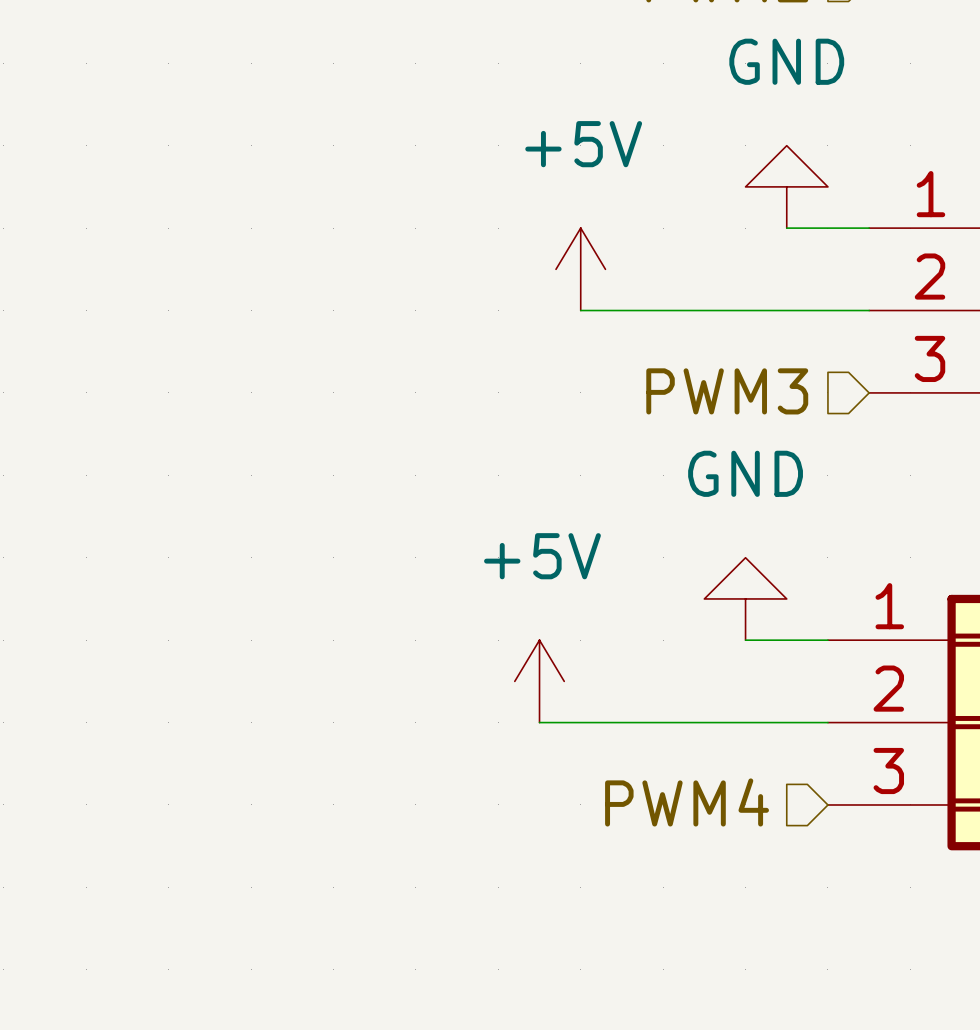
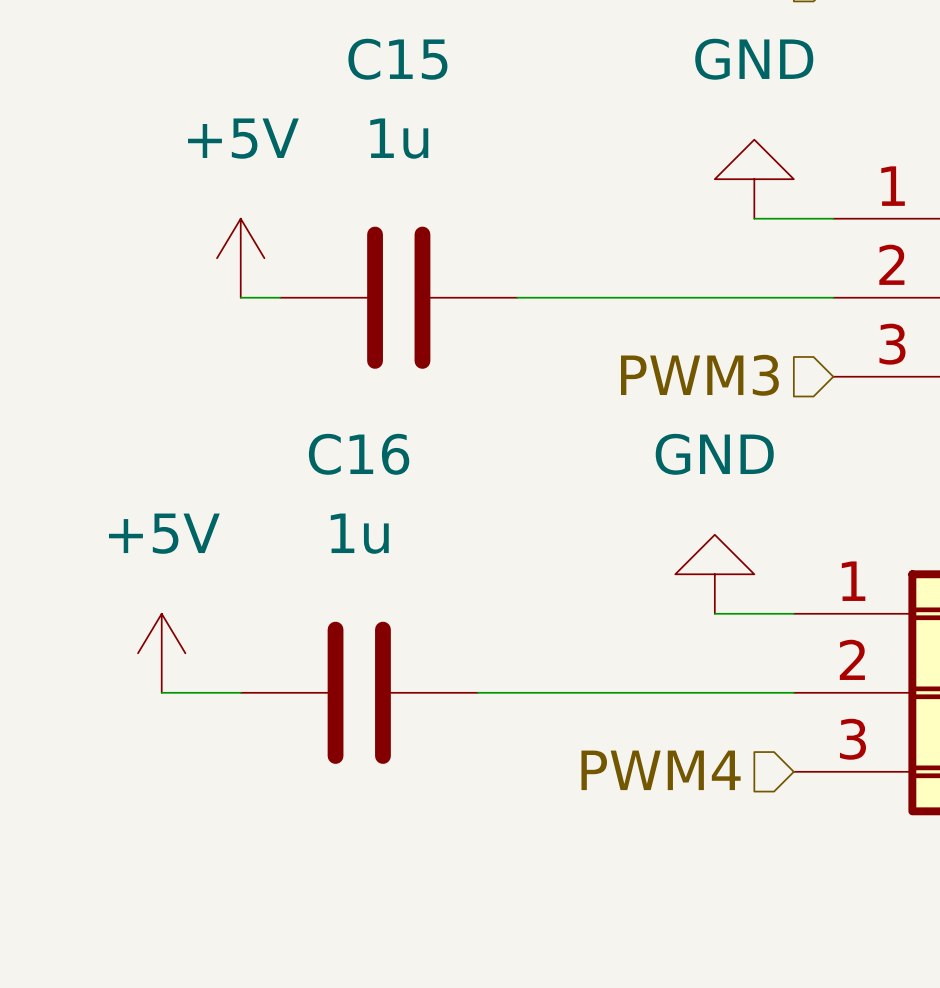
power symbol: none -> +5V (240, 258)
power symbol: +5V (580, 269) -> none
wire: none -> (240, 297) (280, 297)
C15: none -> 1u (398, 297)
wire: none -> (517, 297) (556, 297)
power symbol: none -> +5V (161, 653)
power symbol: +5V (539, 681) -> none
wire: none -> (161, 692) (240, 692)
C16: none -> 1u (359, 692)
wire: none -> (477, 692) (517, 692)

